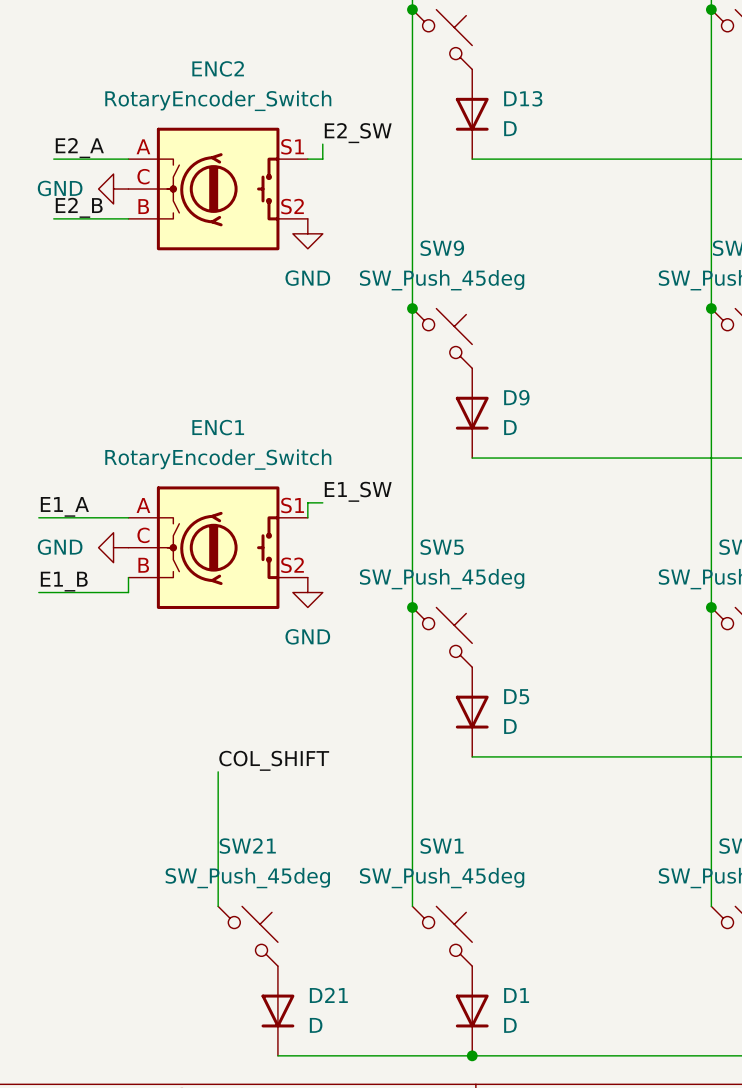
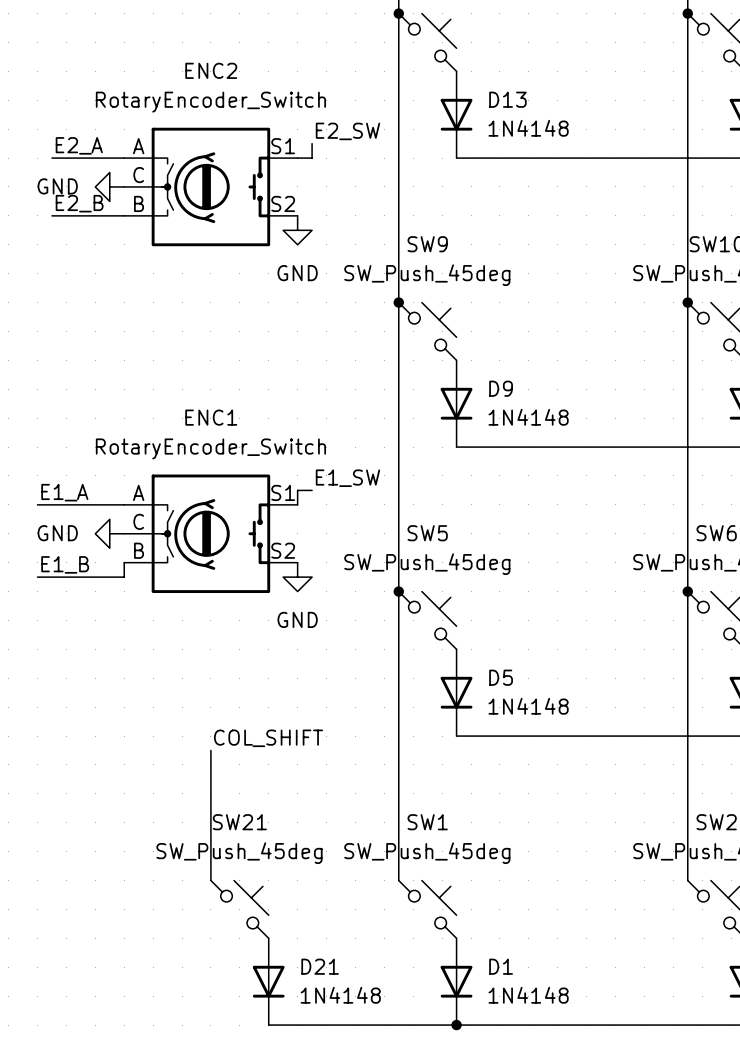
D13 value: D (510, 128) -> 1N4148 (528, 128)
D9 value: D (510, 427) -> 1N4148 (528, 417)
D5 value: D (510, 726) -> 1N4148 (528, 706)
D21 value: D (316, 1025) -> 1N4148 (340, 995)
D1 value: D (510, 1025) -> 1N4148 (528, 995)

